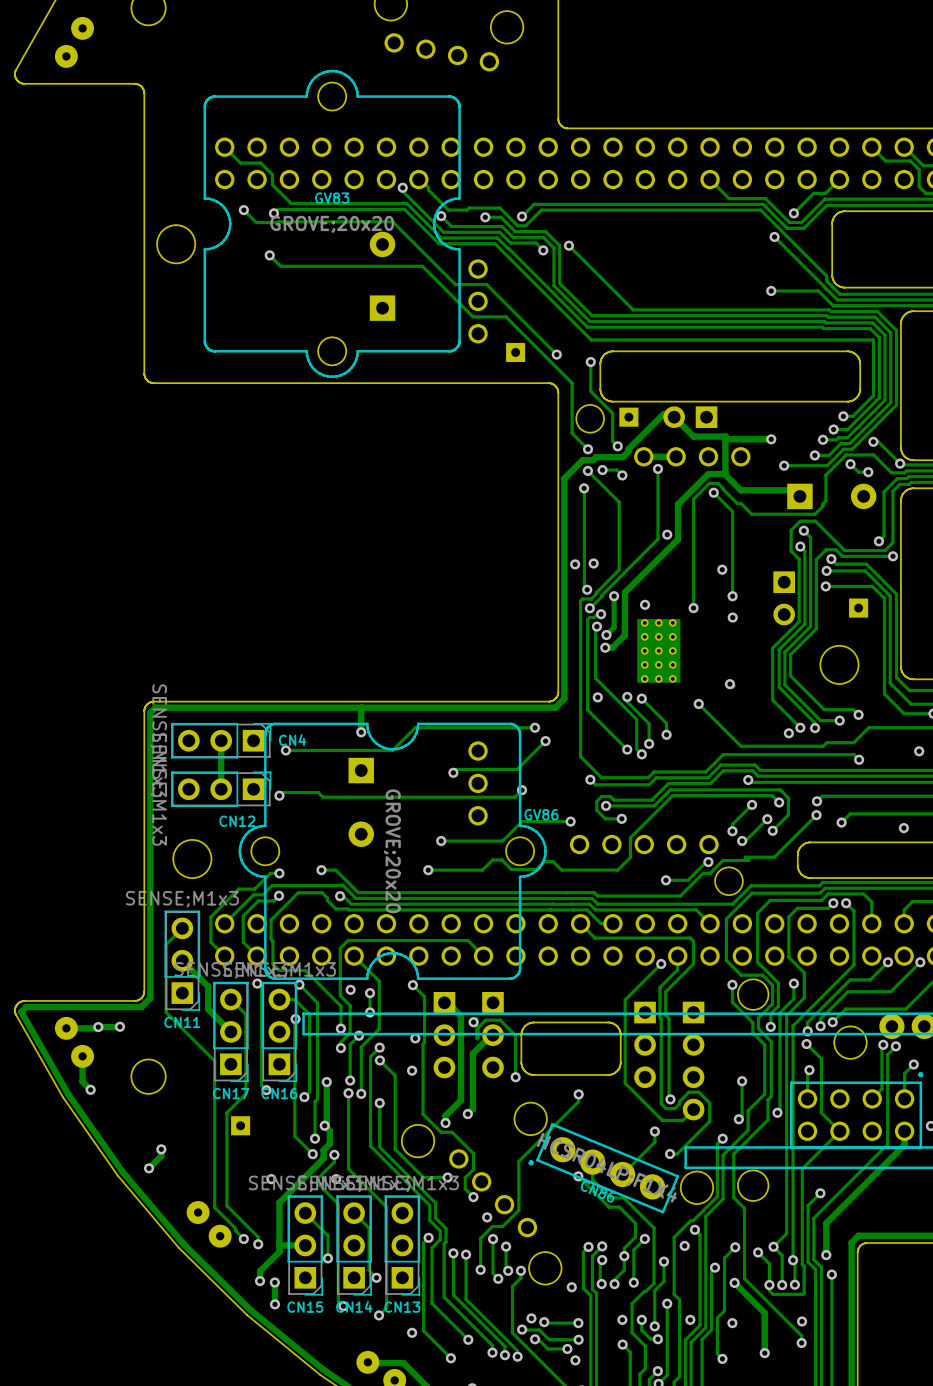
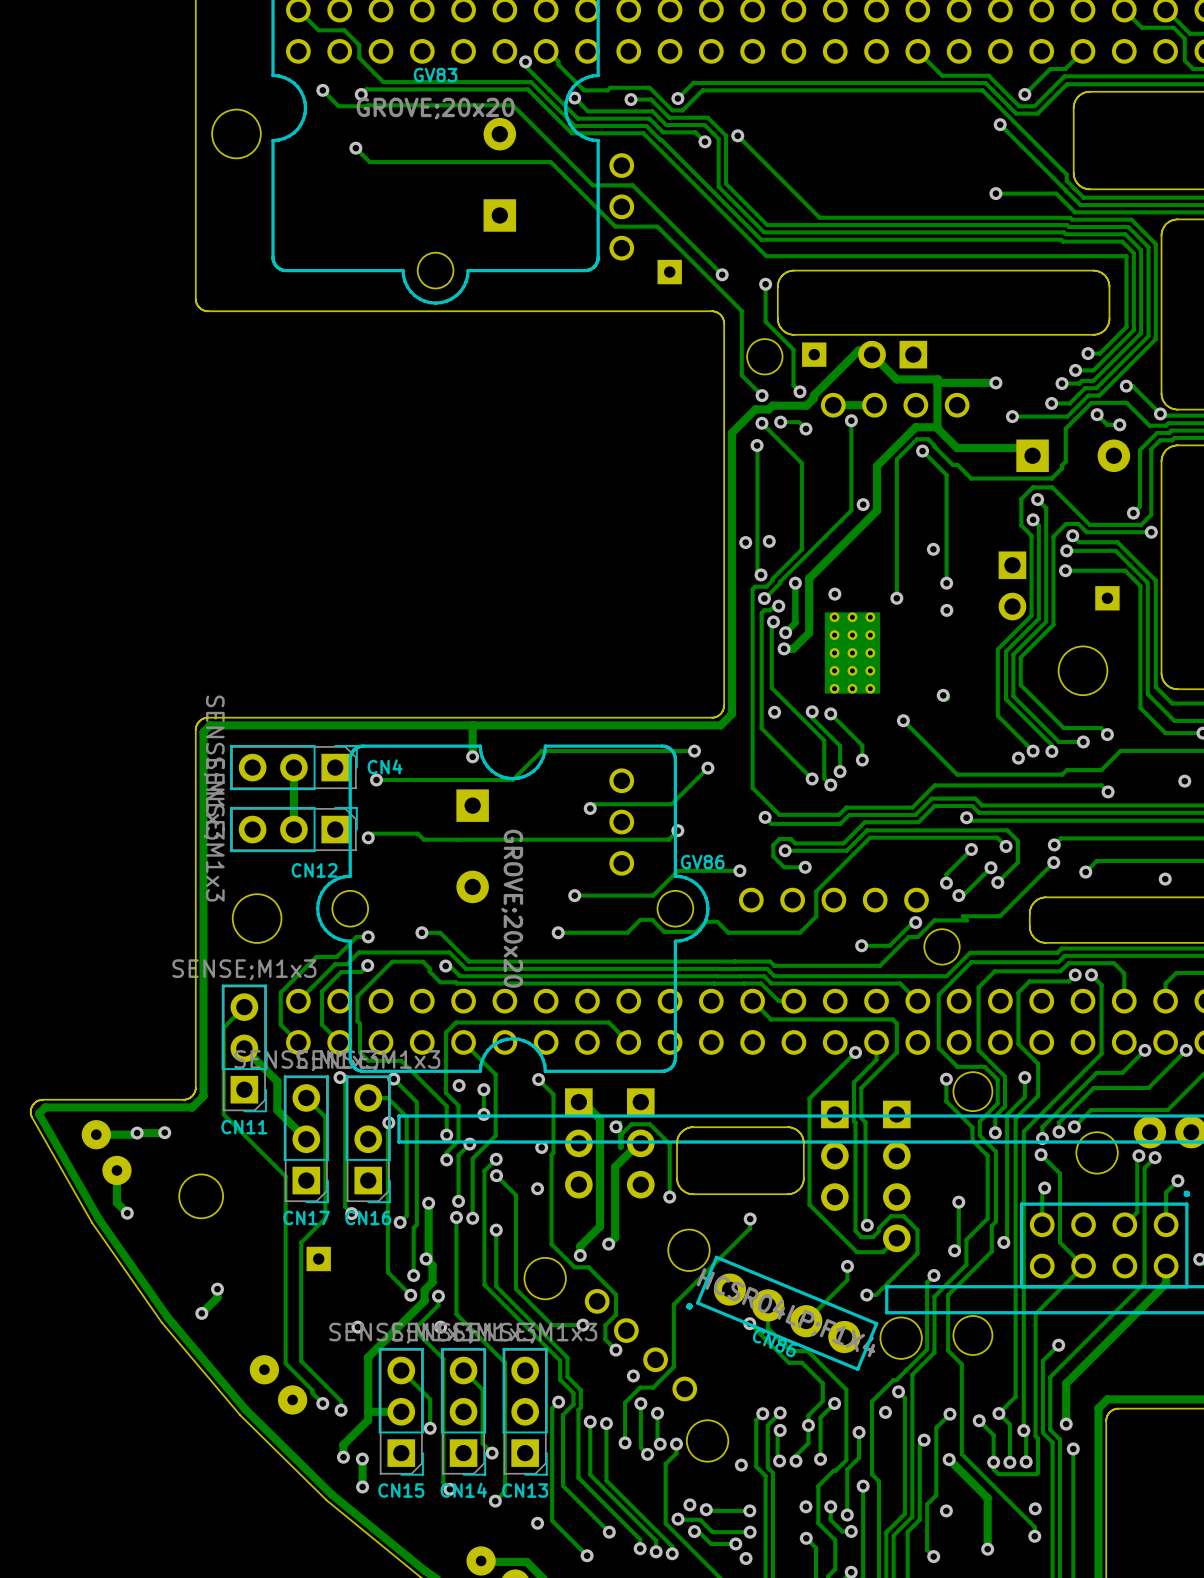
via: (690, 1319) -> none

